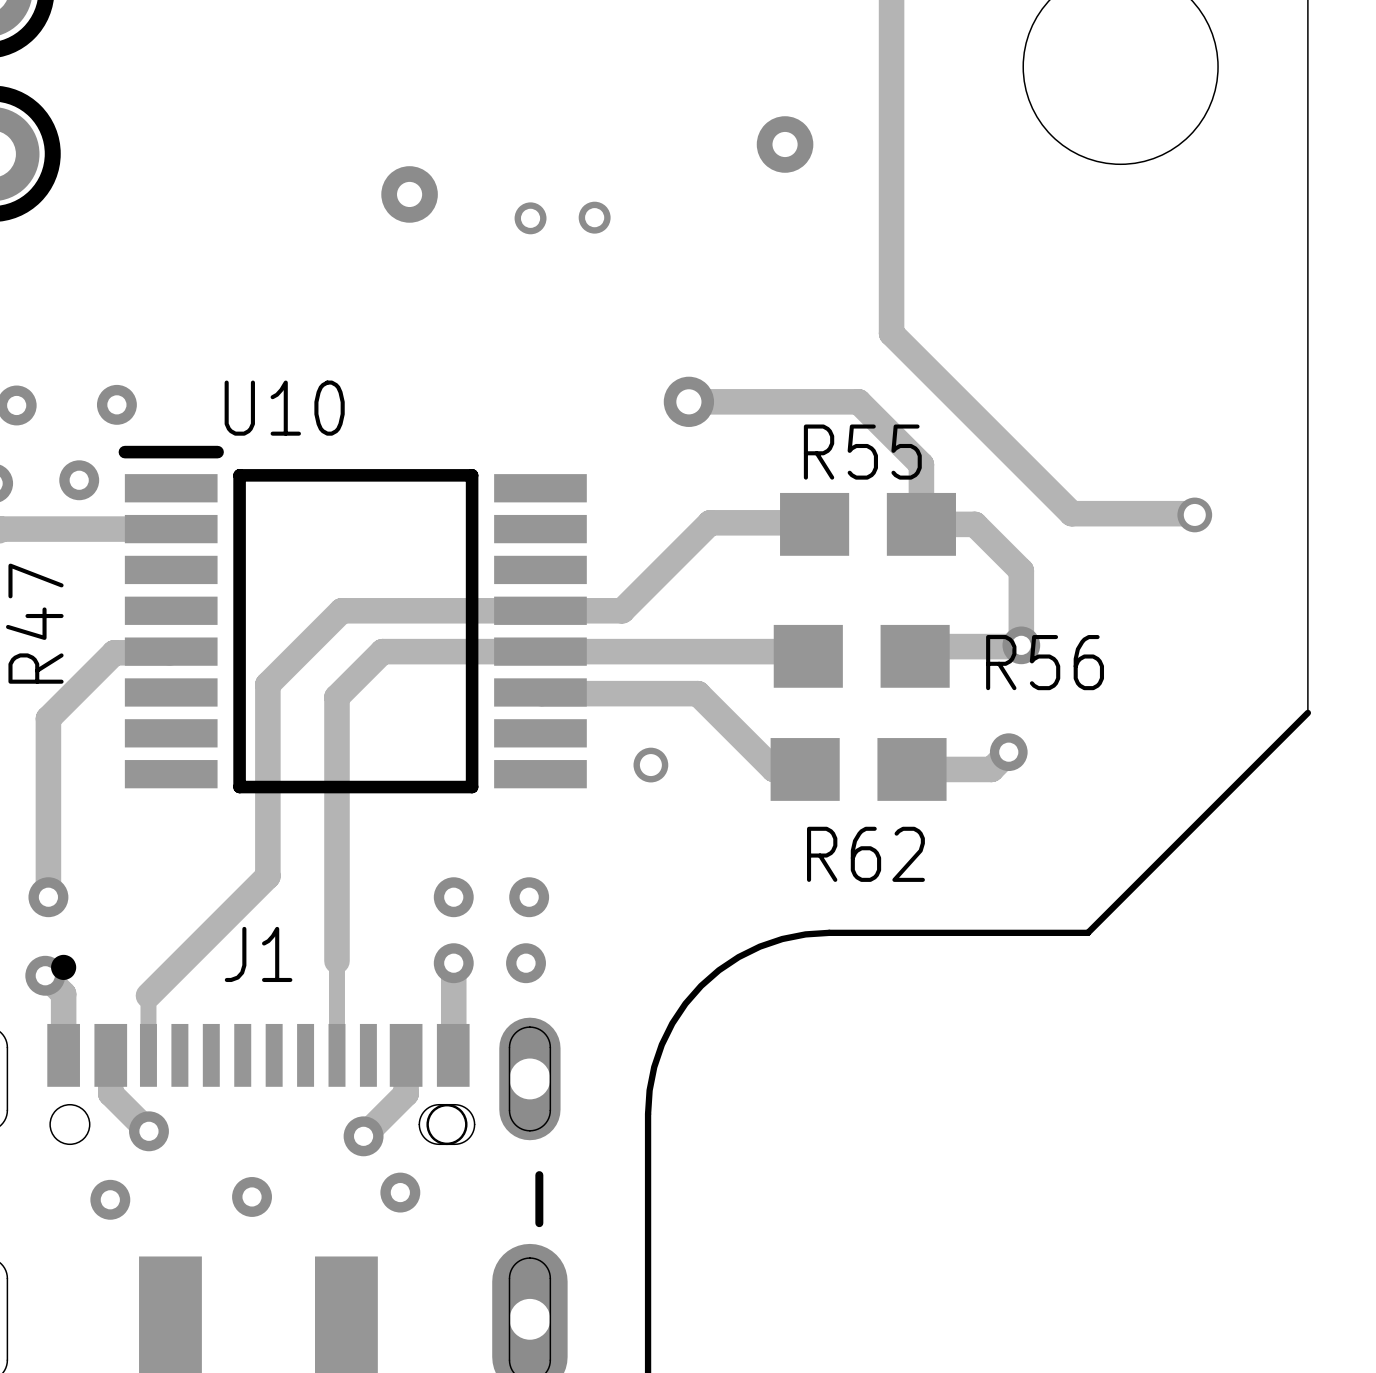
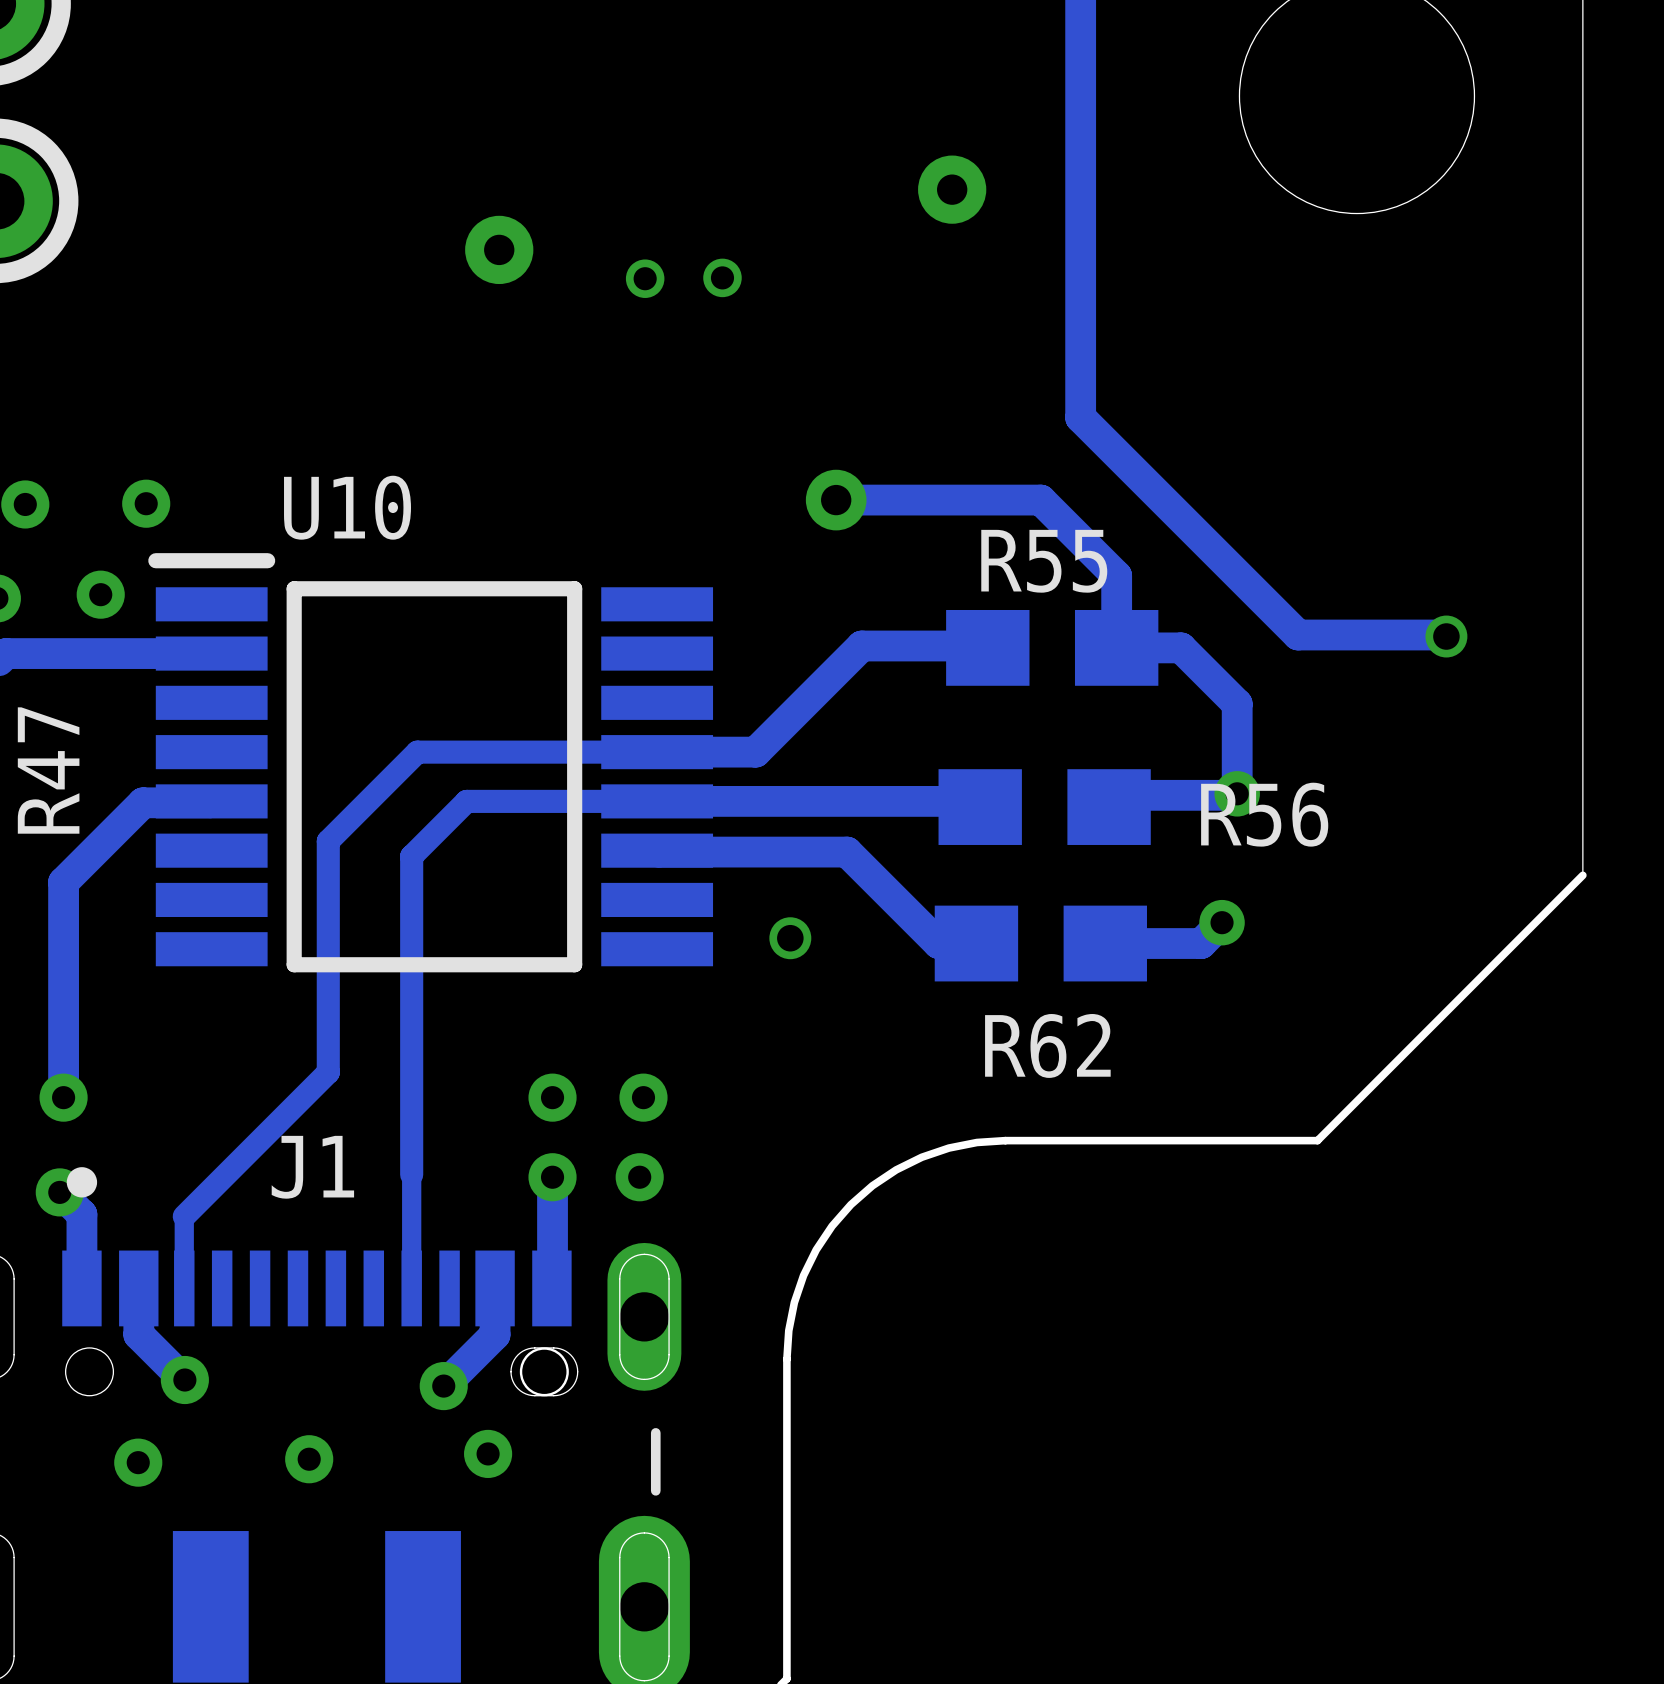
track width: thick (540, 610) (341, 610) (267, 684) (267, 876) (148, 995) -> thin (657, 752) (417, 752) (328, 841) (328, 1072) (184, 1216)
track width: thick (540, 651) (382, 651) (336, 697) (336, 961) -> thin (657, 801) (466, 801) (411, 856) (411, 1174)

